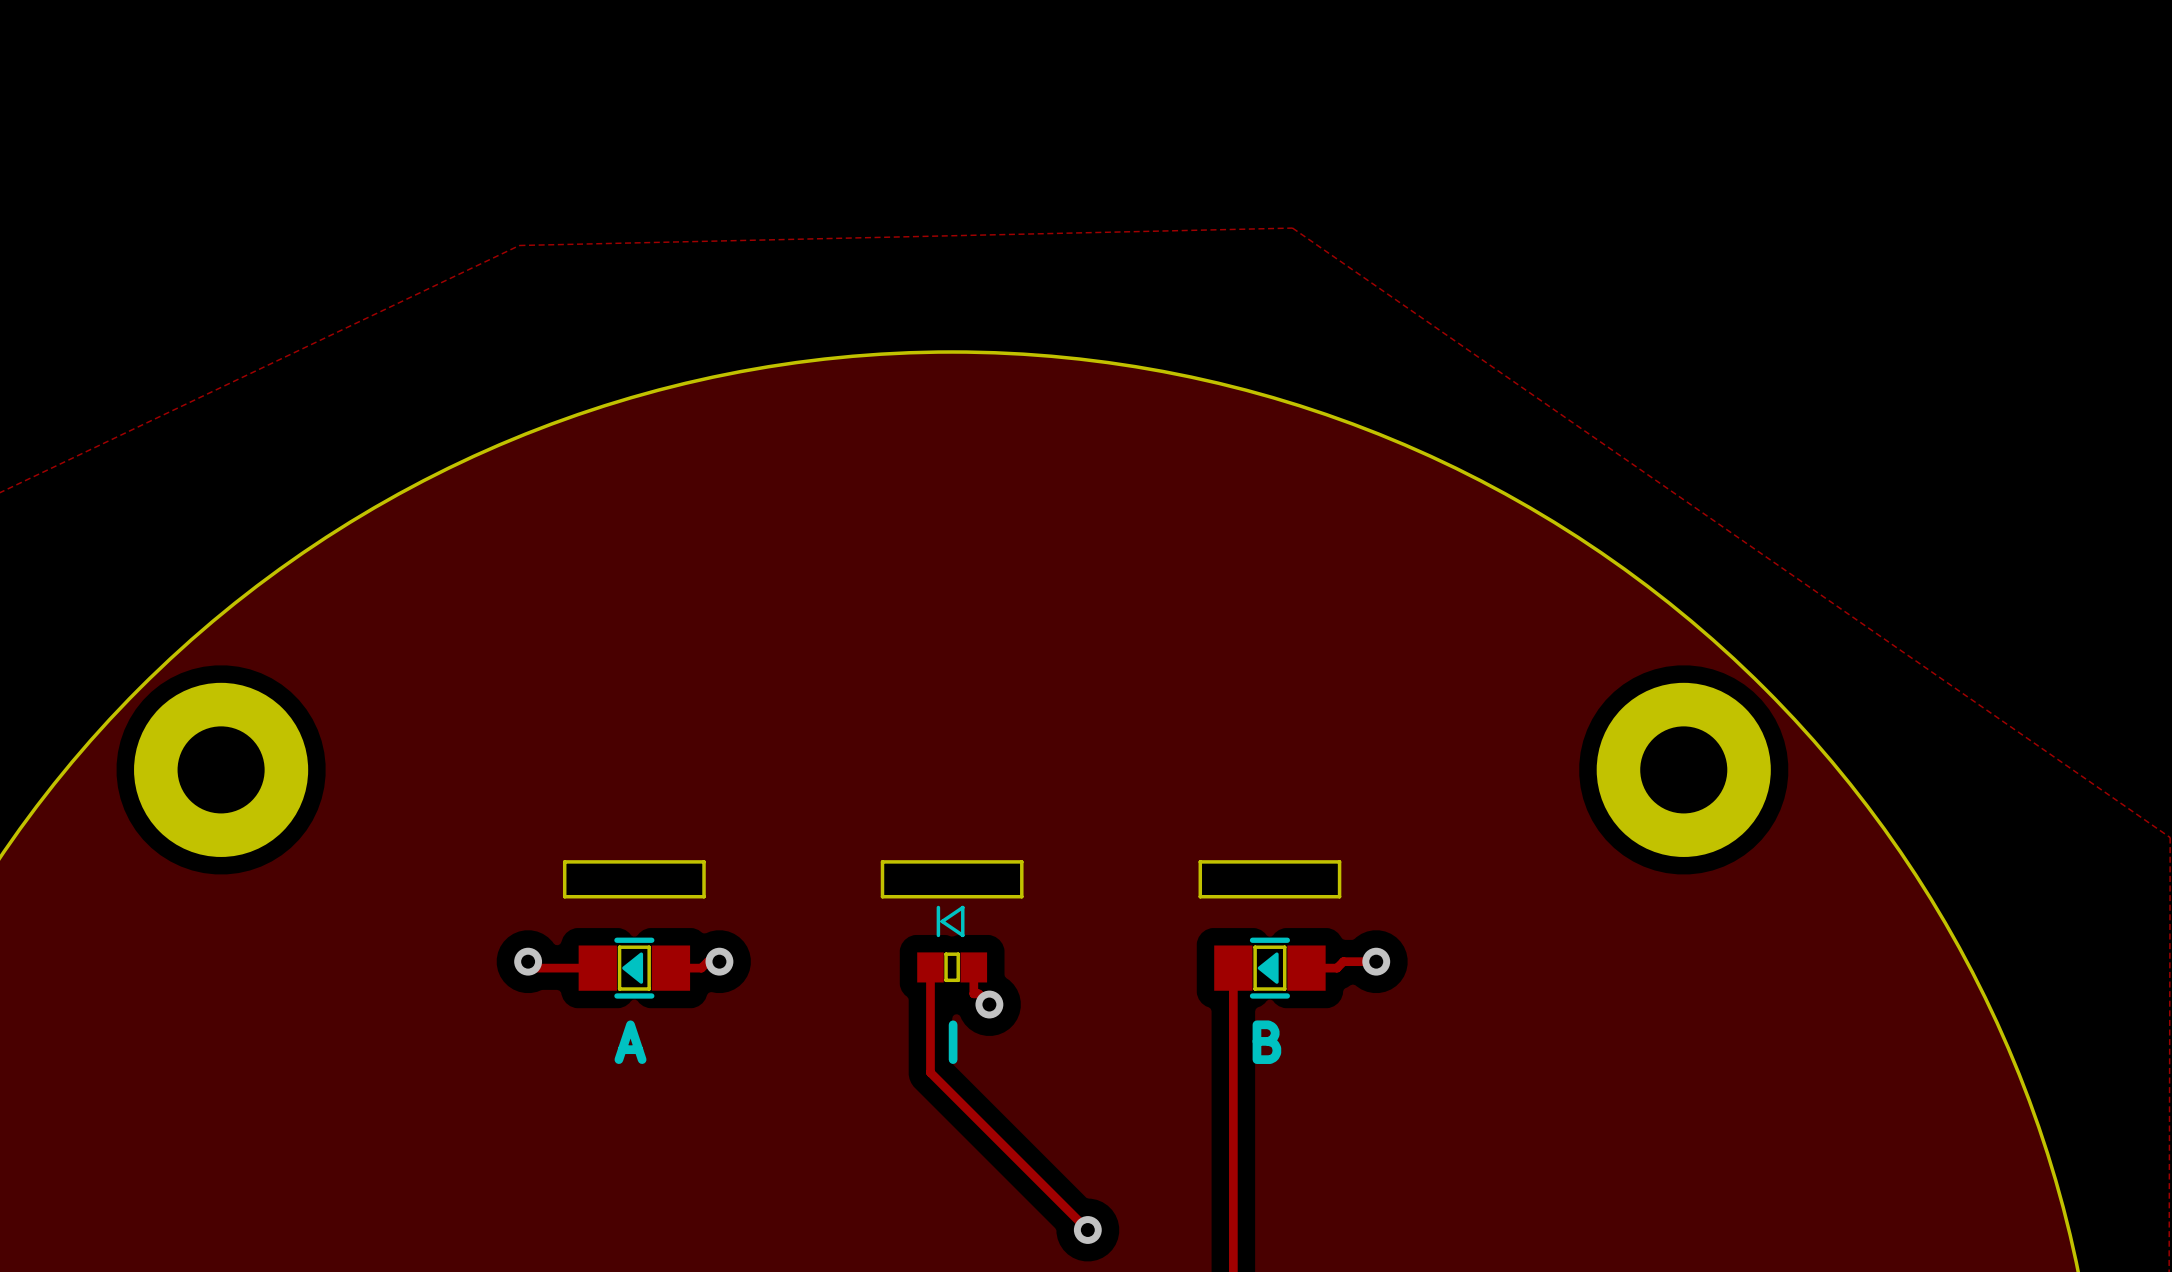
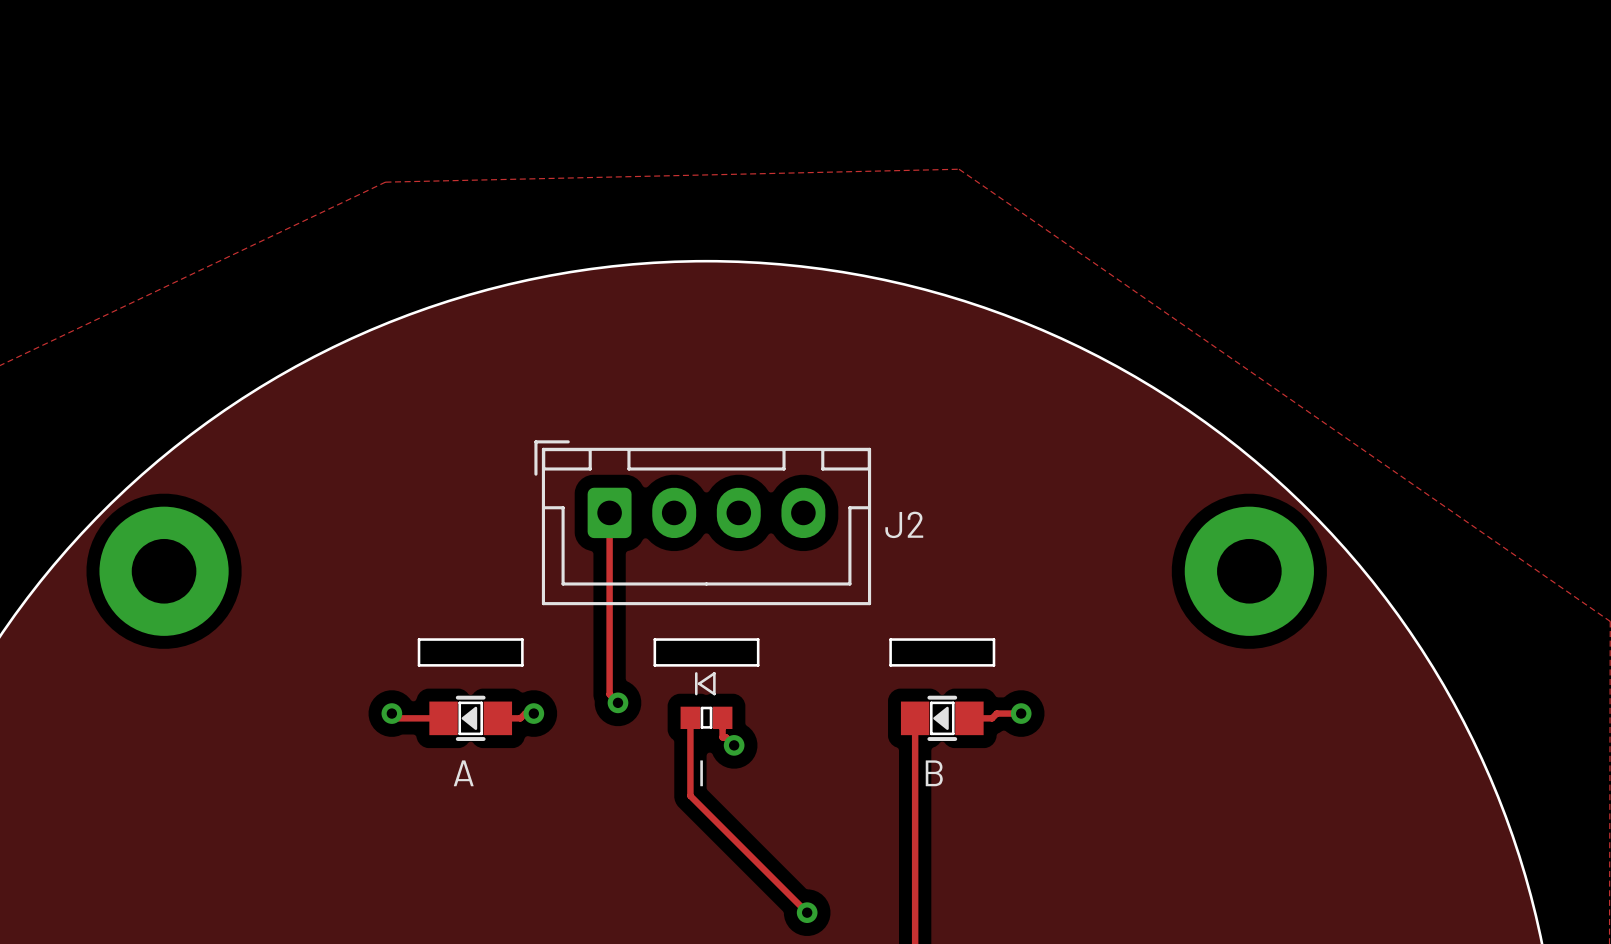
track: none -> (609, 512) (609, 694) (617, 702)
J2: none -> (702, 522)
via: none -> (617, 702)

